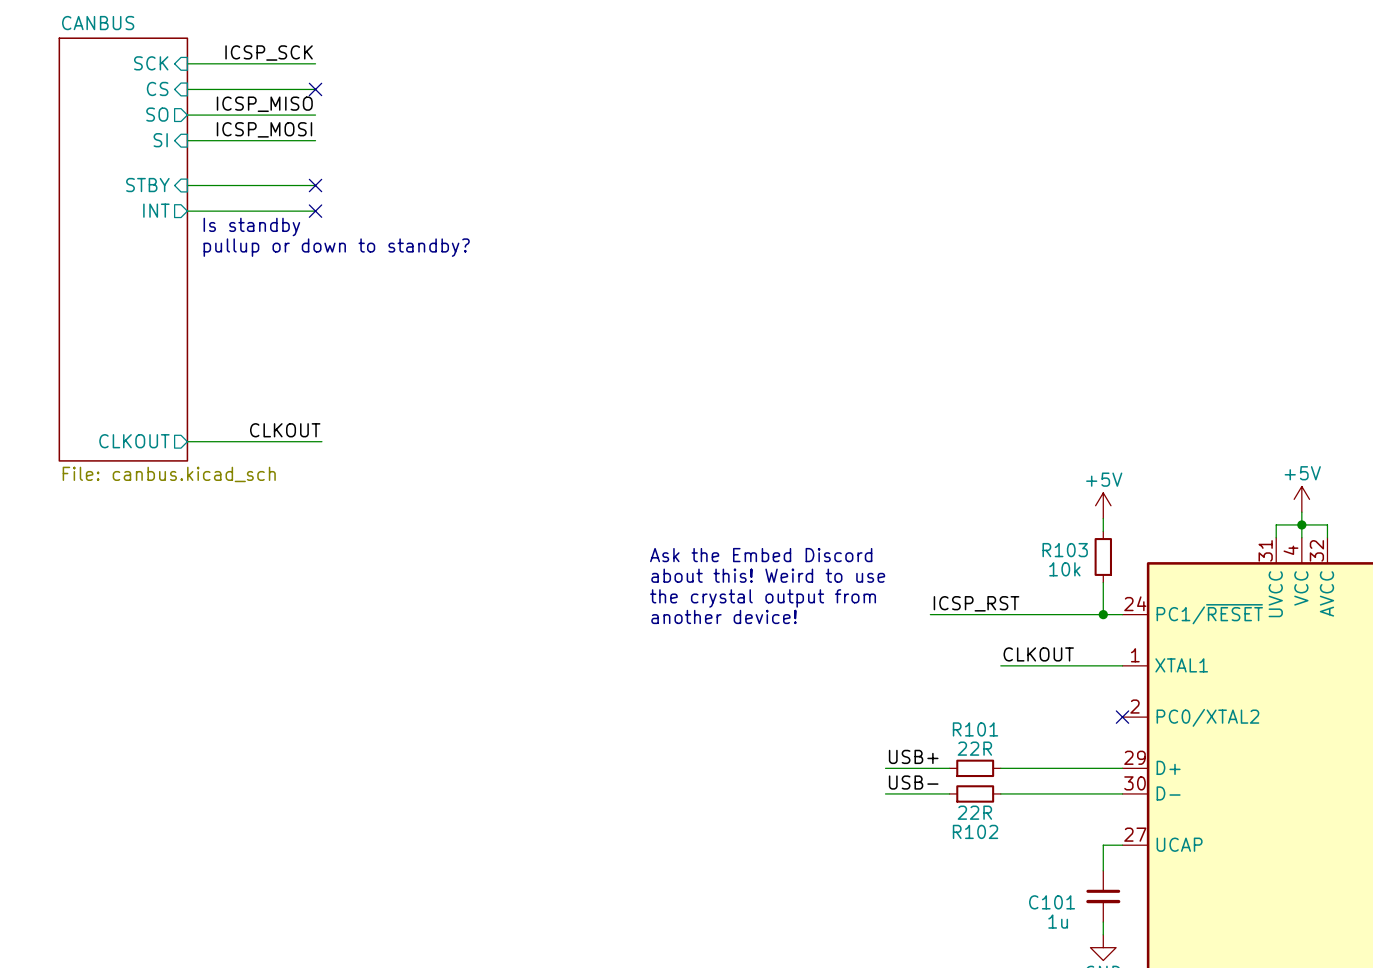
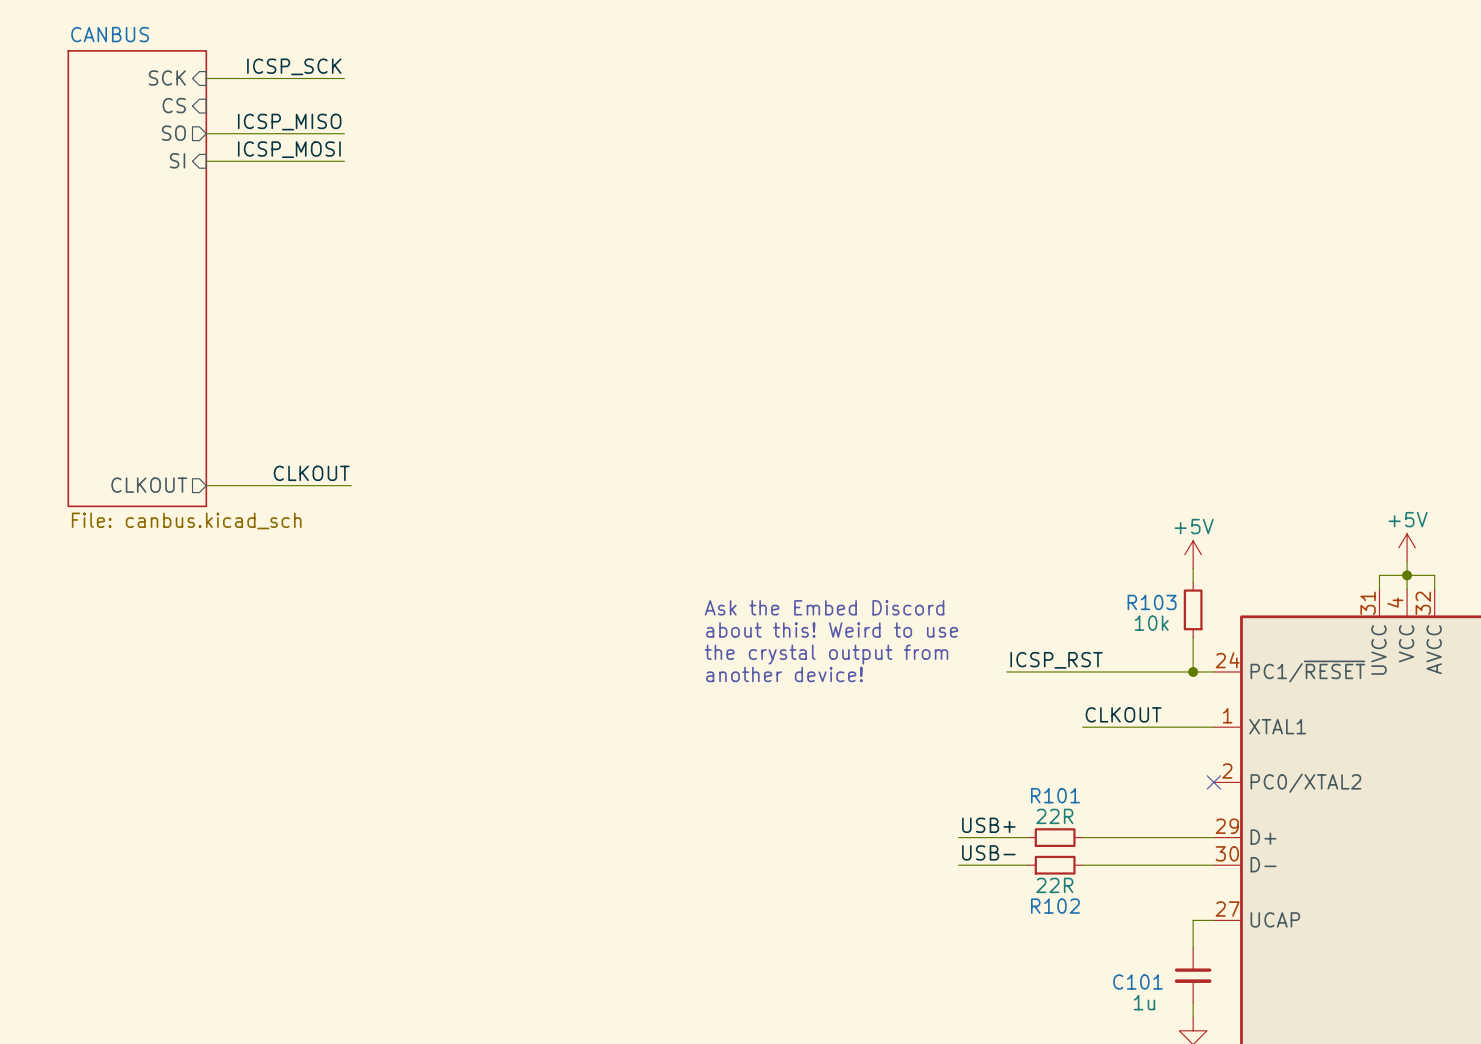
wire: (187, 89) (315, 89) -> none
no-connect mark: (315, 89) -> none
sheet pin: STBY (147, 185) -> none
wire: (187, 185) (315, 185) -> none
no-connect mark: (315, 185) -> none
sheet pin: INT (156, 210) -> none
wire: (187, 211) (315, 211) -> none
no-connect mark: (315, 211) -> none
text: Is standby (251, 226) -> none
text: pullup or down to standby? (336, 247) -> none

